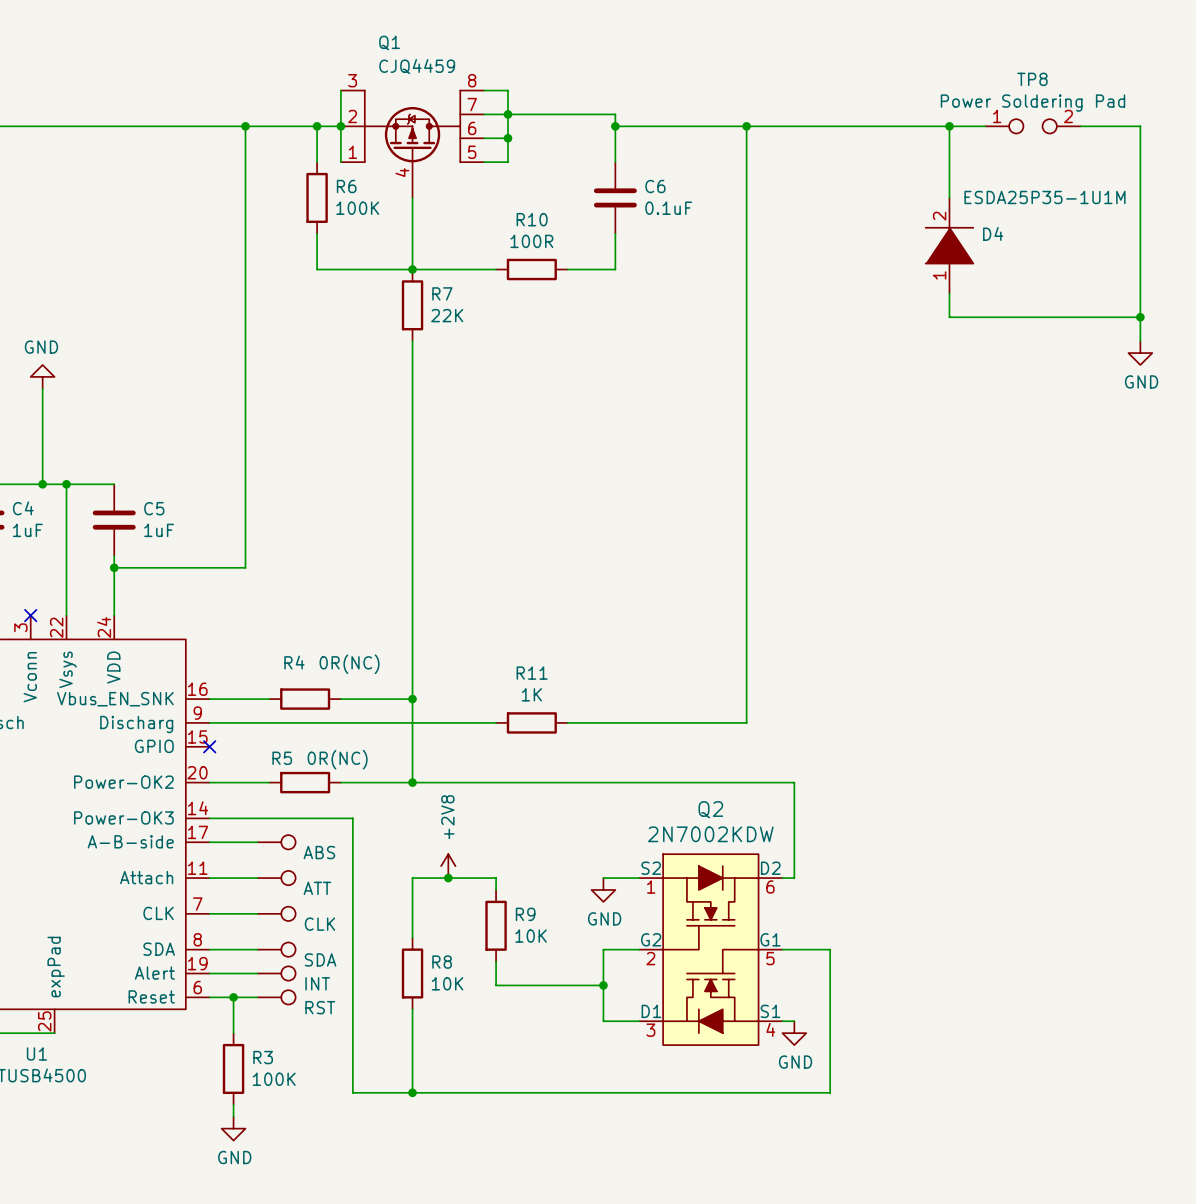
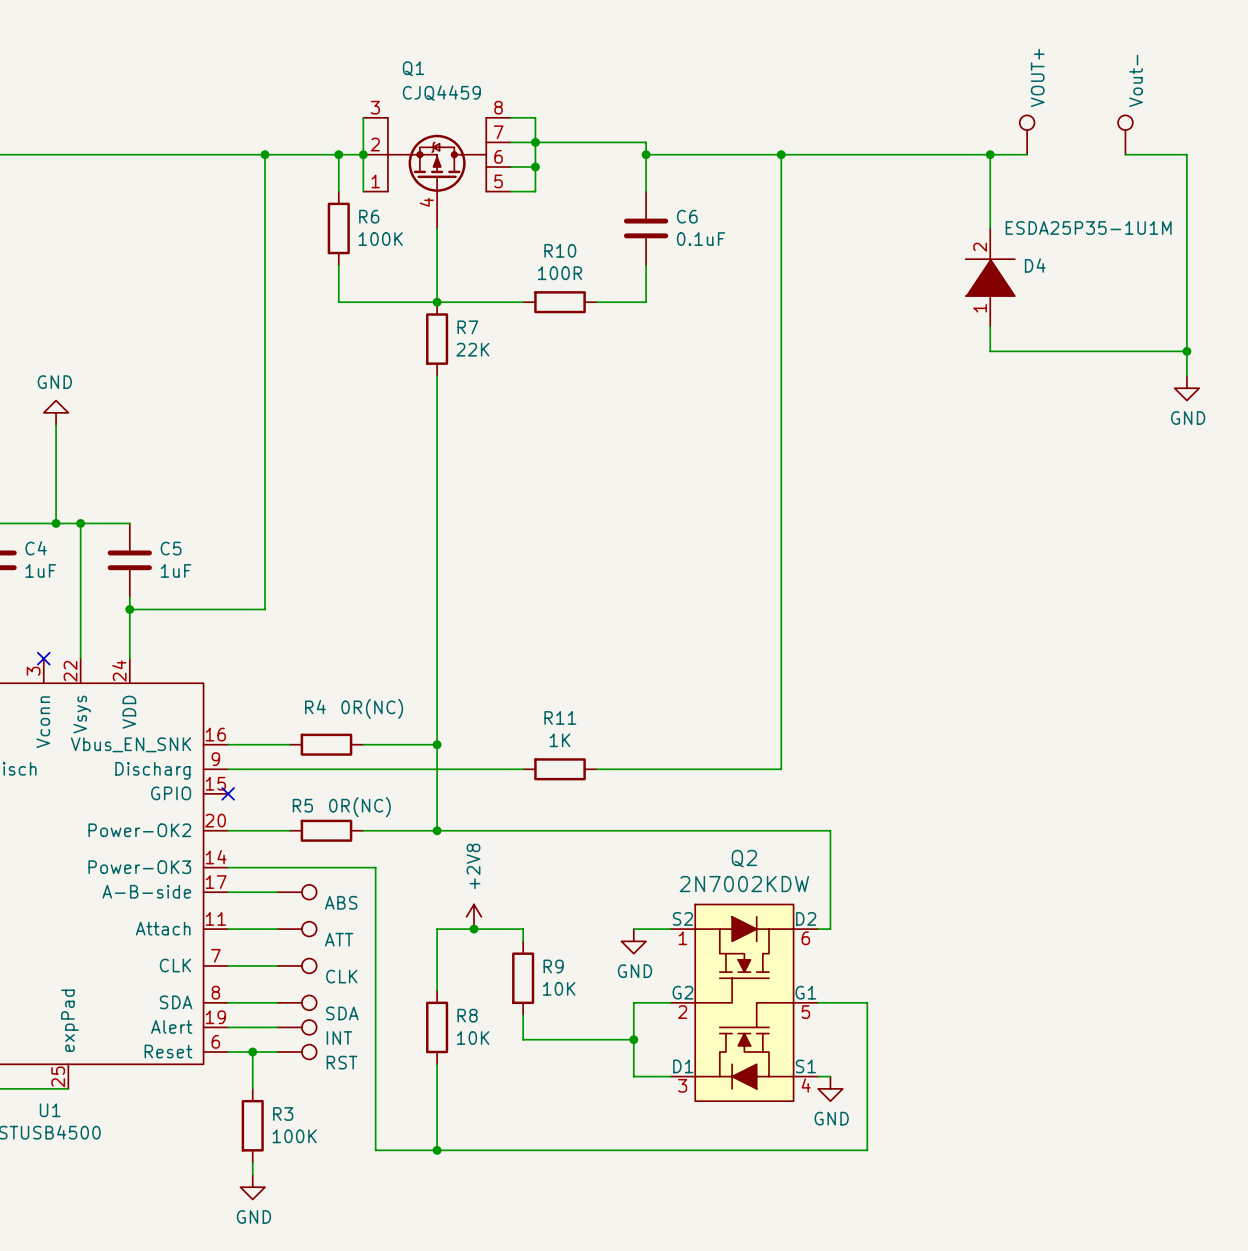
part: none -> VOUT+ (1027, 135)
part: none -> Vout- (1125, 135)
TP8: Power Soldering Pad (1032, 126) -> none

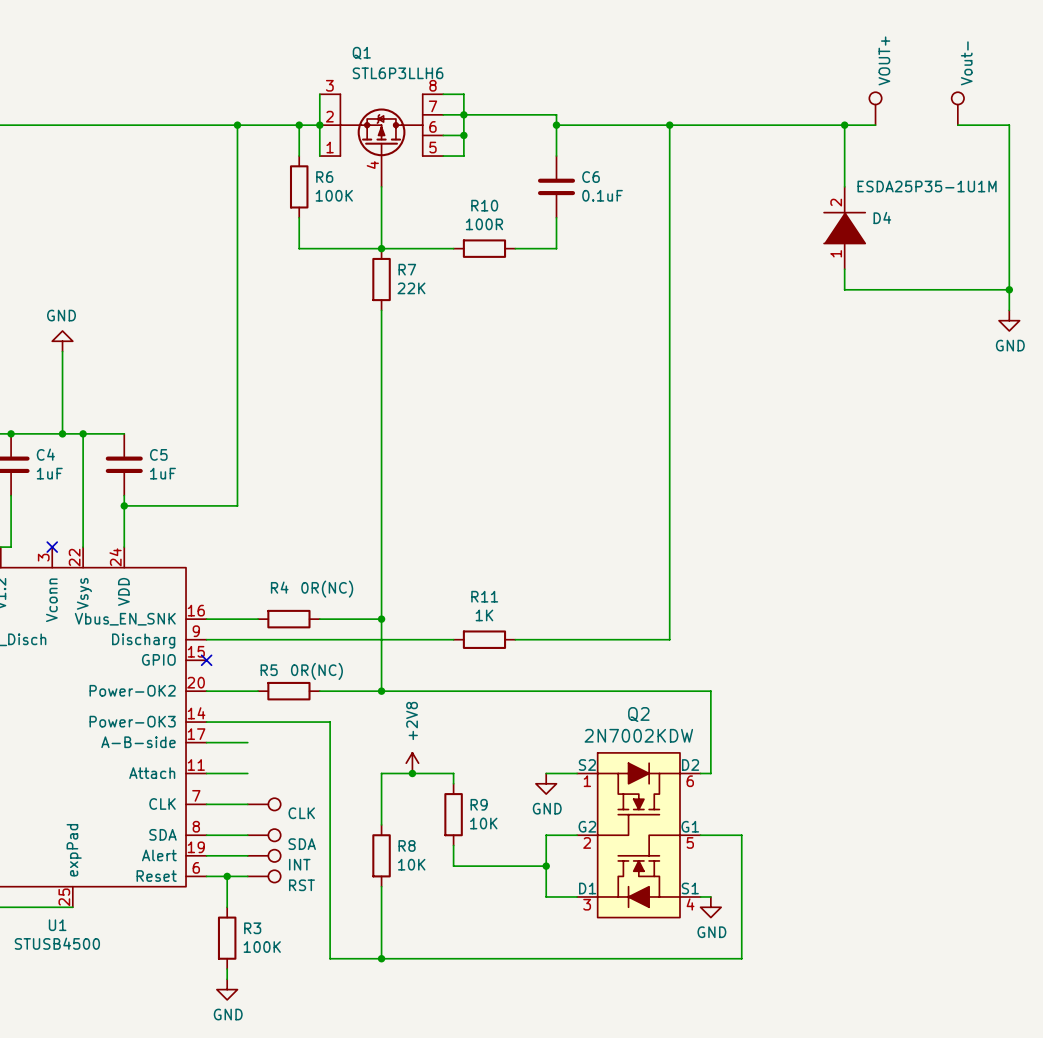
Q1 value: CJQ4459 (441, 93) -> STL6P3LLH6 (398, 73)
part: ABS (296, 892) -> none
part: ATT (296, 929) -> none

